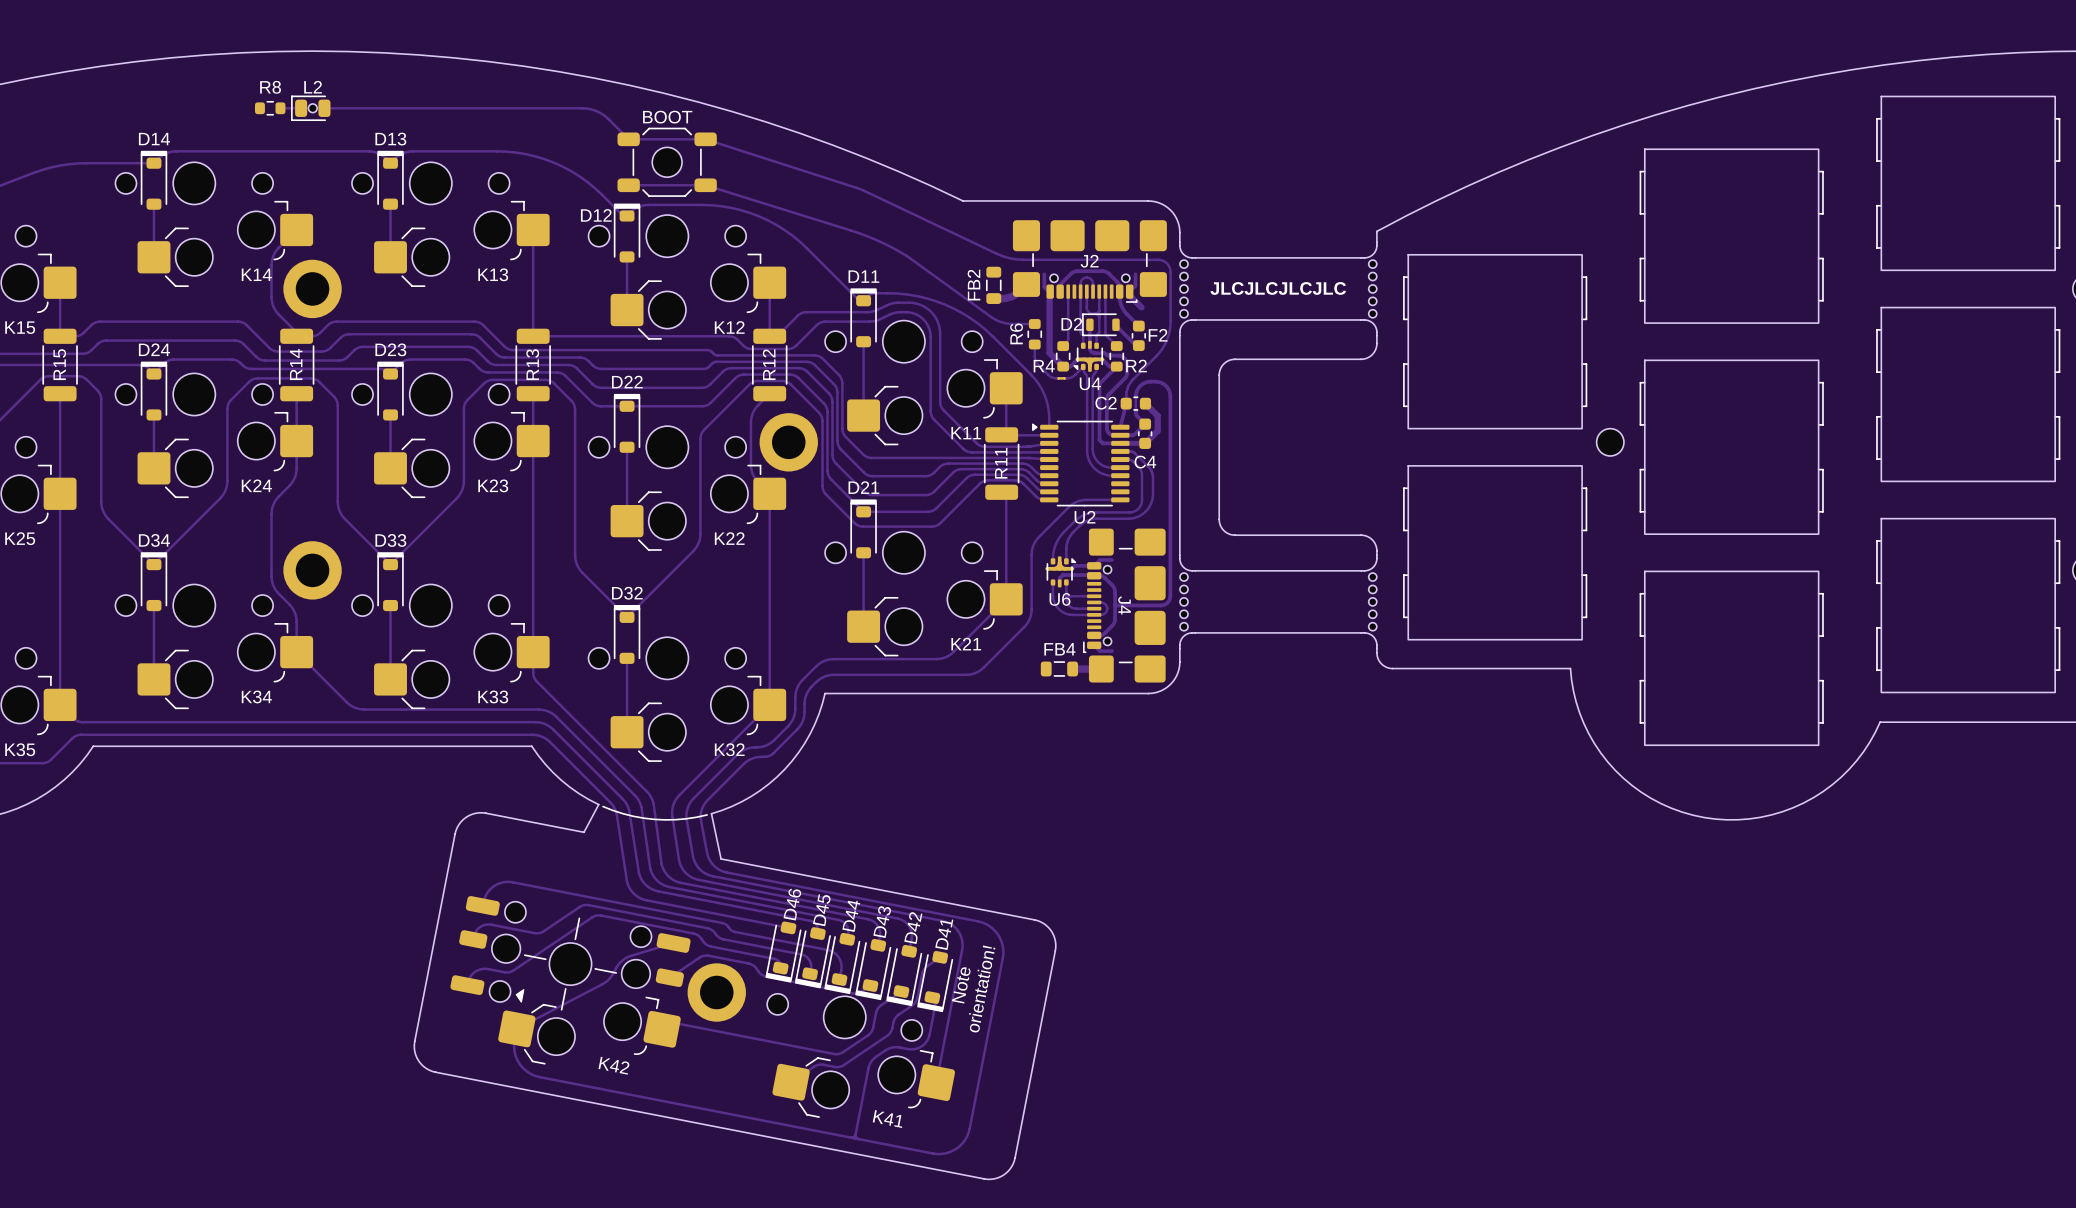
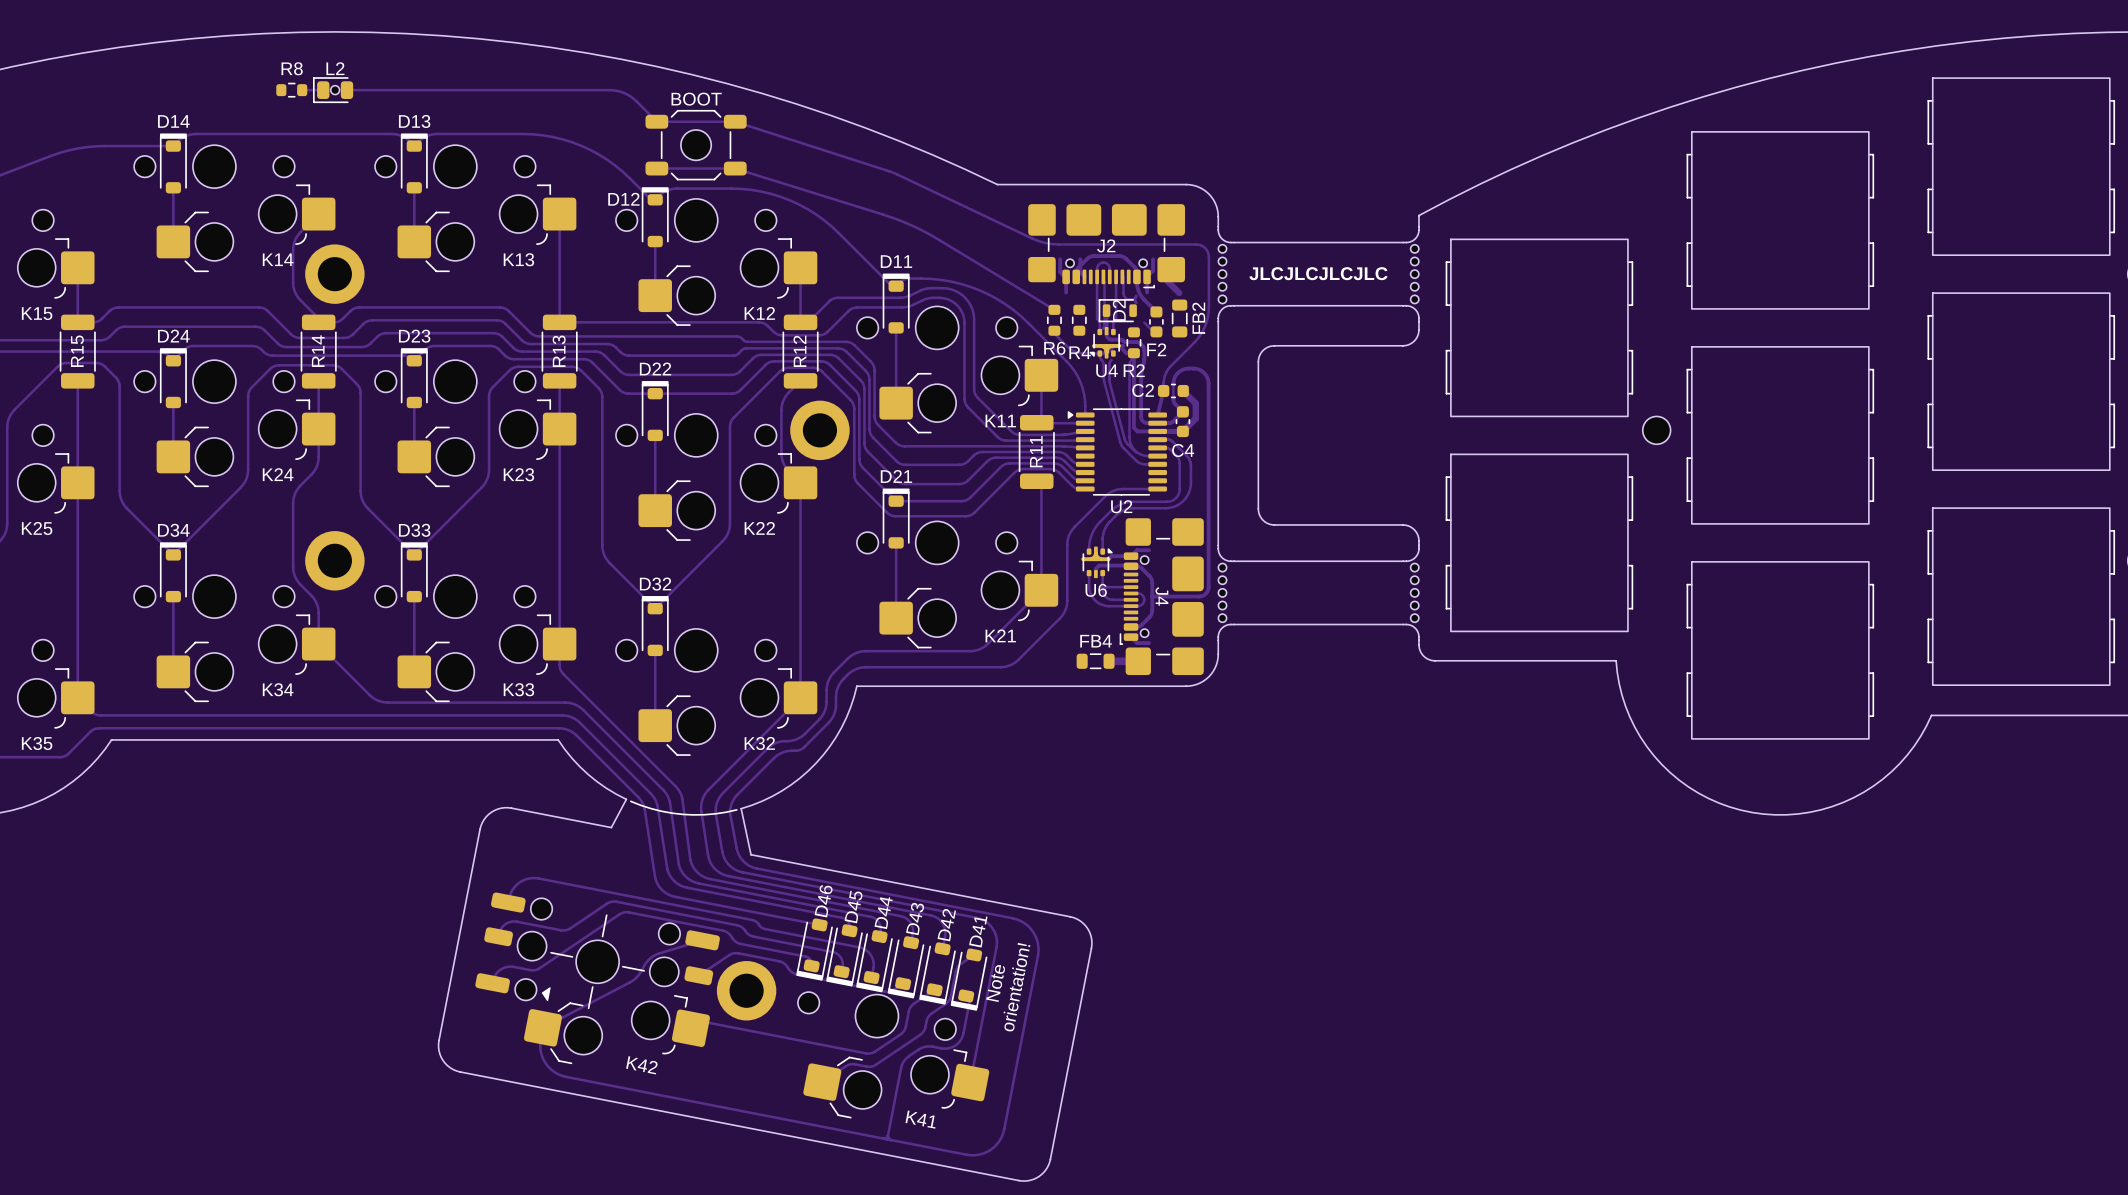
track: (906, 255) (994, 319) (1009, 323) (1034, 324) -> (940, 240) (1054, 309)
J2 position: (1089, 261) -> (1106, 246)
track: (1077, 271) (1071, 273) (1062, 282) (1059, 289) -> (1114, 256) (1090, 256) (1077, 268) (1075, 274)
track: (1082, 271) (1106, 271) (1118, 283) (1120, 289) -> (1119, 256) (1125, 258) (1134, 267) (1137, 274)
track: none -> (1060, 259) (1060, 272) (1064, 276)
track: none -> (1153, 259) (1153, 270) (1147, 276) (1147, 292)
track: (1135, 274) (1135, 285) (1129, 291) -> none
FB2 name position: FB2 (973, 285) -> FB2 (1198, 318)
FB2 position: (993, 285) -> (1179, 318)
track: (1019, 291) (1009, 297) (993, 298) -> none
track: none -> (1066, 276) (1066, 292)
track: (1099, 291) (1099, 331) (1096, 335) (1096, 345) -> (1116, 276) (1116, 317) (1113, 321) (1113, 332)
track: (1049, 296) (1049, 352) (1063, 366) -> none
track: (1093, 296) (1092, 280) (1088, 277) (1083, 278) (1080, 283) (1080, 332) (1083, 335) (1083, 345) -> (1109, 281) (1108, 265) (1105, 262) (1100, 263) (1097, 268) (1097, 318) (1099, 322) (1099, 332)
track: (1105, 296) (1105, 332) (1107, 336) -> none
track: (1119, 296) (1123, 310) (1138, 326) -> (1136, 281) (1141, 296) (1156, 311)
track: none -> (1106, 310) (1108, 338) (1137, 342) (1143, 347) (1144, 360) (1141, 374) (1141, 417) (1145, 423) (1157, 423)
D2 name rotation: 0° (1071, 324) -> 90° counterclockwise (1119, 310)
track: (1089, 324) (1091, 351) (1120, 355) (1126, 362) (1126, 376) (1106, 398) (1106, 429) (1113, 435) -> none
D2 position: (1100, 324) -> (1117, 310)
track: (1115, 325) (1136, 345) -> none
R6 name rotation: 0° (1016, 333) -> 90° clockwise (1054, 348)
R6 position: (1034, 334) -> (1054, 320)
F2 position: (1138, 335) -> (1156, 321)
F2 name position: F2 (1158, 335) -> F2 (1156, 349)
track: (1034, 344) (1036, 363) (1049, 376) (1058, 378) -> none
R4 position: (1063, 356) -> (1079, 320)
U4 position: (1088, 356) -> (1105, 342)
R2 position: (1116, 356) -> (1133, 342)
track: (1093, 359) (1102, 359) (1109, 366) (1116, 366) (1099, 383) (1099, 440) (1102, 443) -> (1119, 345) (1126, 353) (1133, 353) (1133, 427) (1139, 431)
R2 name position: R2 (1136, 366) -> R2 (1134, 370)
track: none -> (1111, 360) (1109, 364) (1109, 381) (1124, 438) (1135, 452)
part: (1061, 378) -> none
track: (1064, 378) (1073, 376) (1083, 366) (1087, 377) (1087, 456) (1096, 470) (1111, 475) -> (1054, 330) (1054, 333) (1072, 350) (1081, 353) (1099, 353) (1103, 364) (1104, 381) (1121, 444) (1138, 462) (1149, 464)

